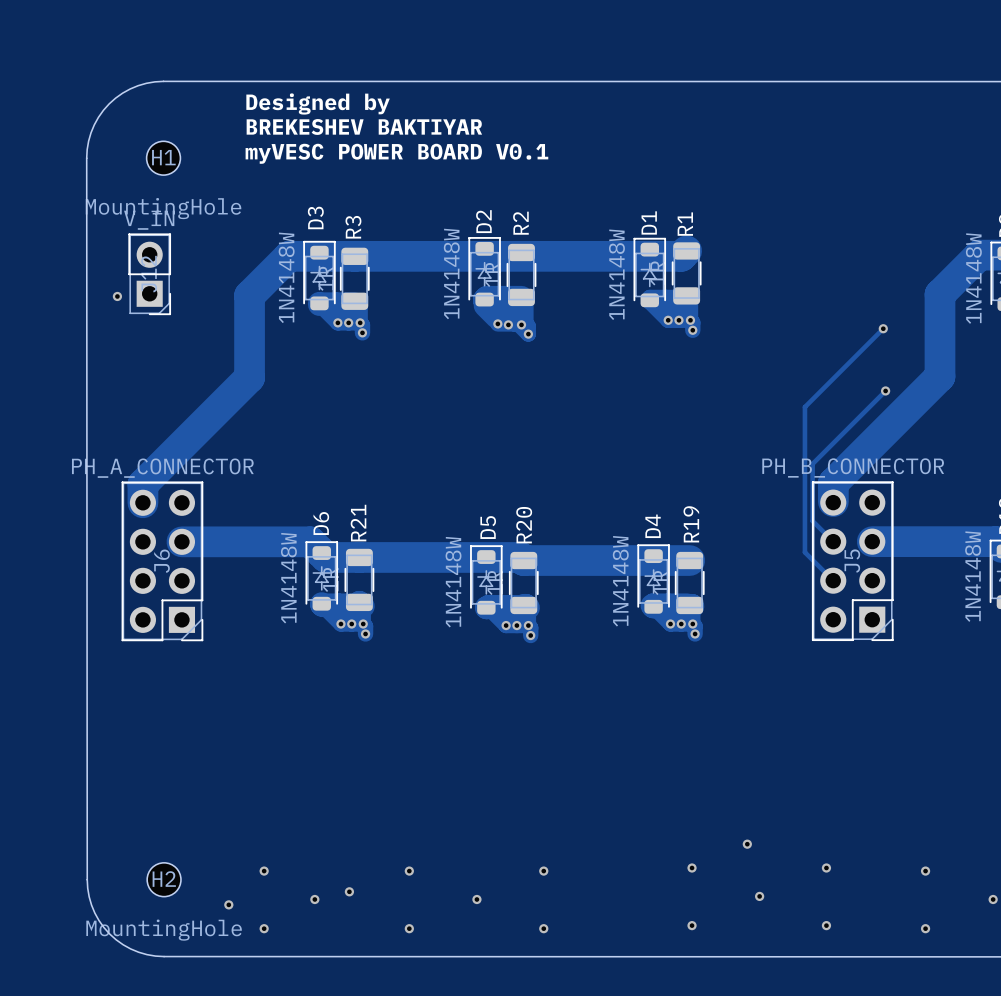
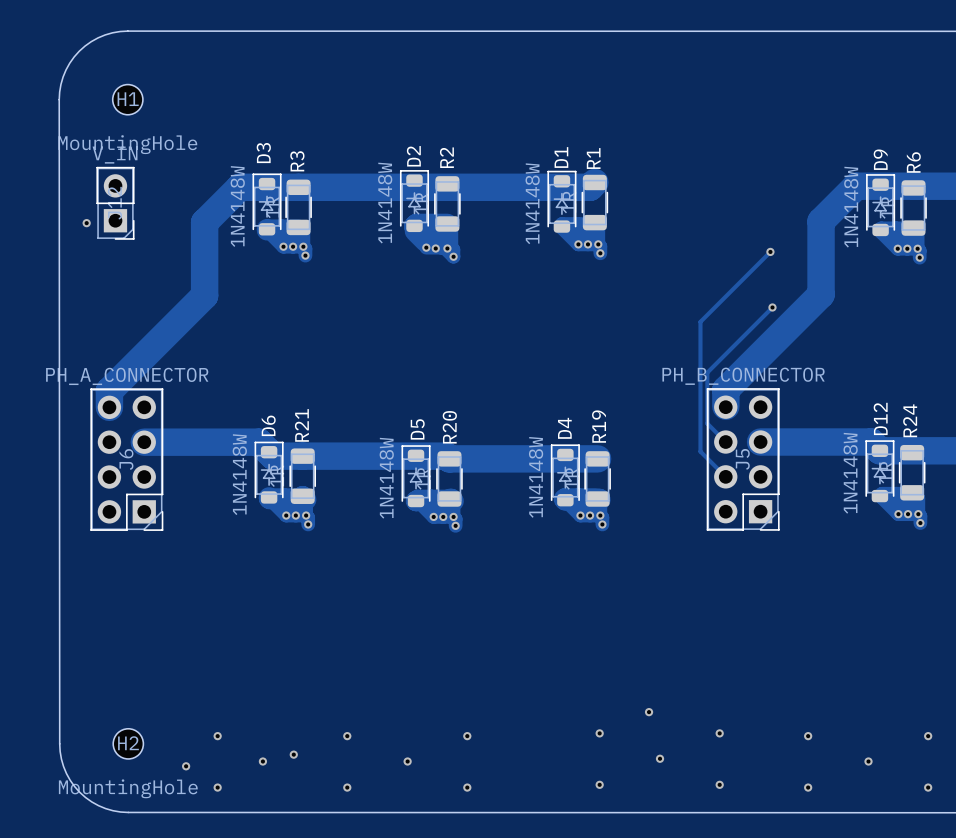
text: Designed by (318, 103) -> none
text: BREKESHEV BAKTIYAR (364, 126) -> none
text: myVESC POWER BOARD V0.1 (396, 153) -> none

